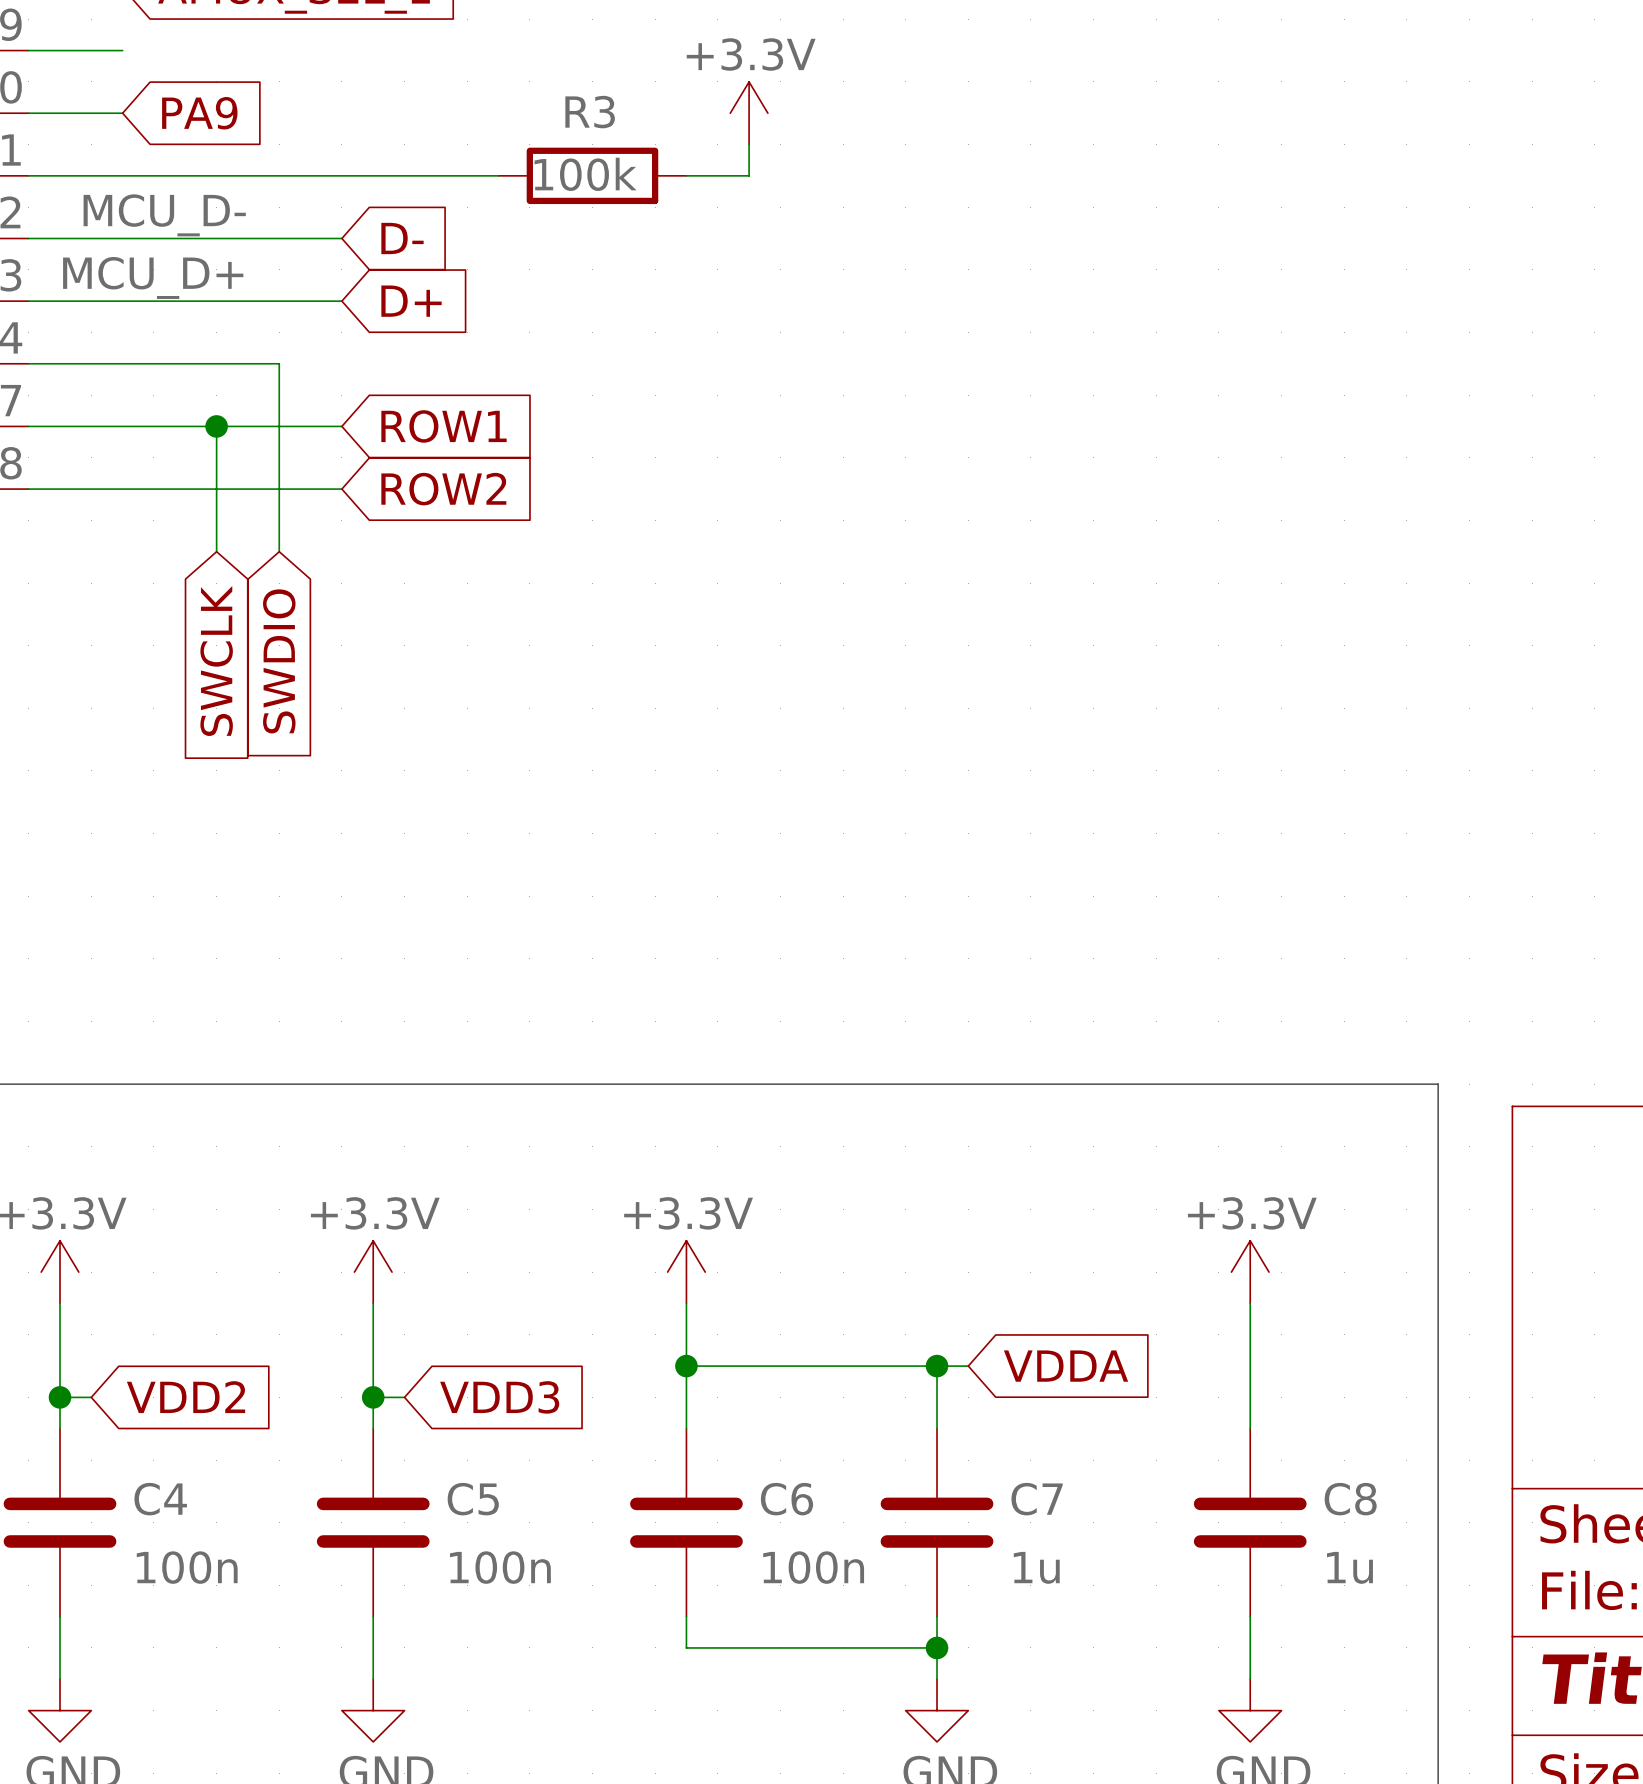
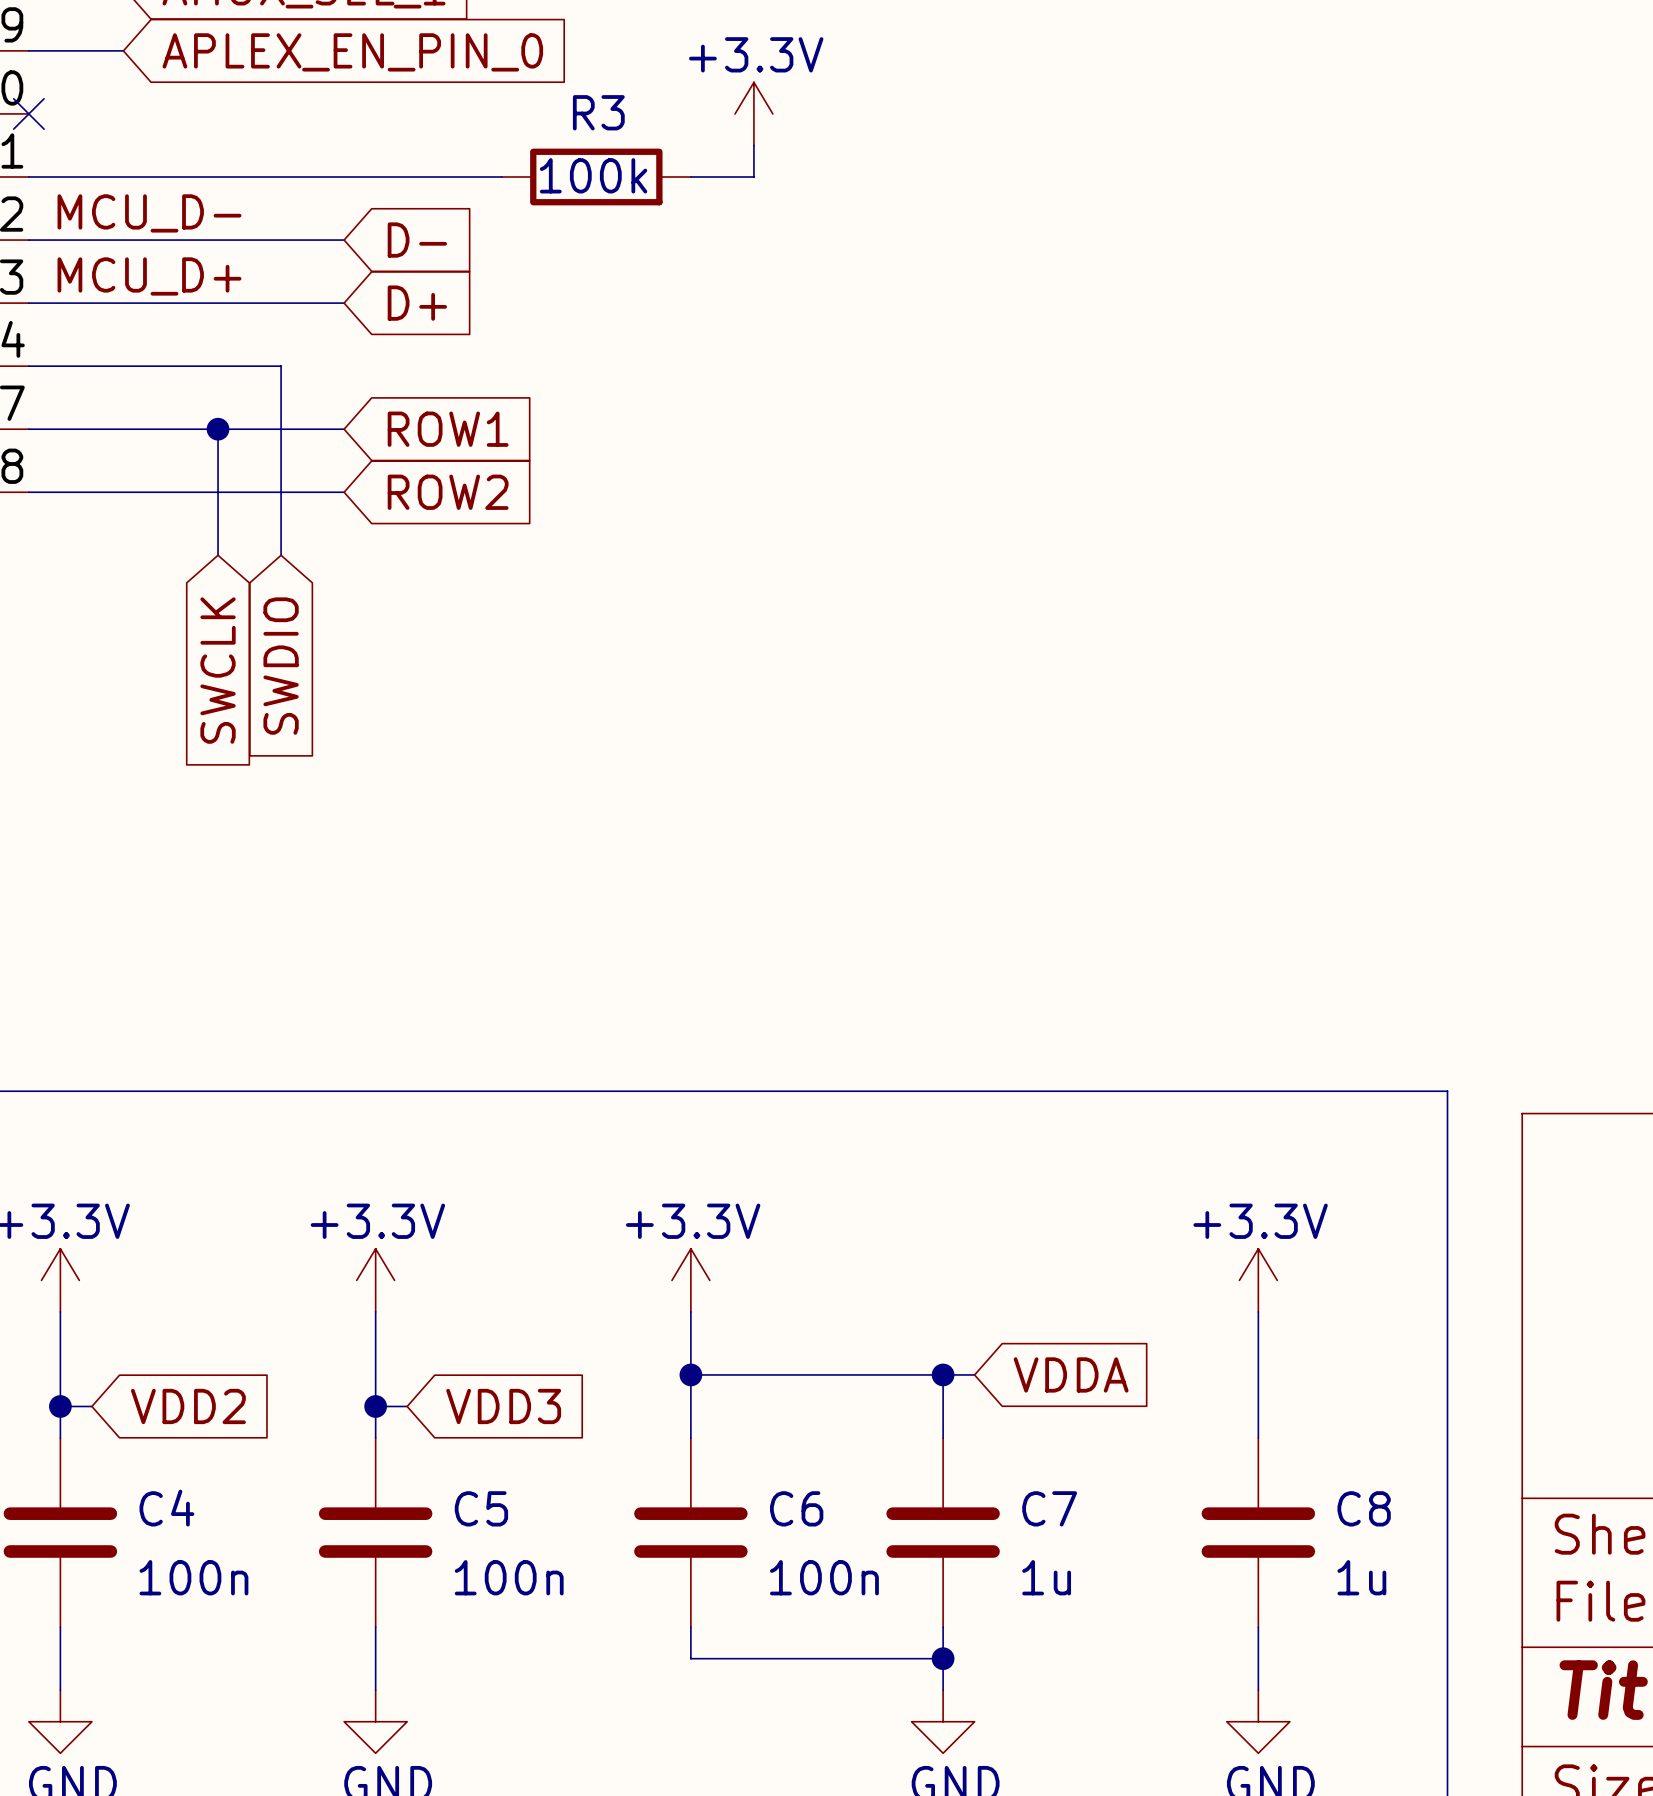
global label: none -> APLEX_EN_PIN_0 (352, 52)
wire: (28, 113) (122, 113) -> none
no-connect mark: none -> (28, 113)
global label: PA9 (199, 113) -> none

